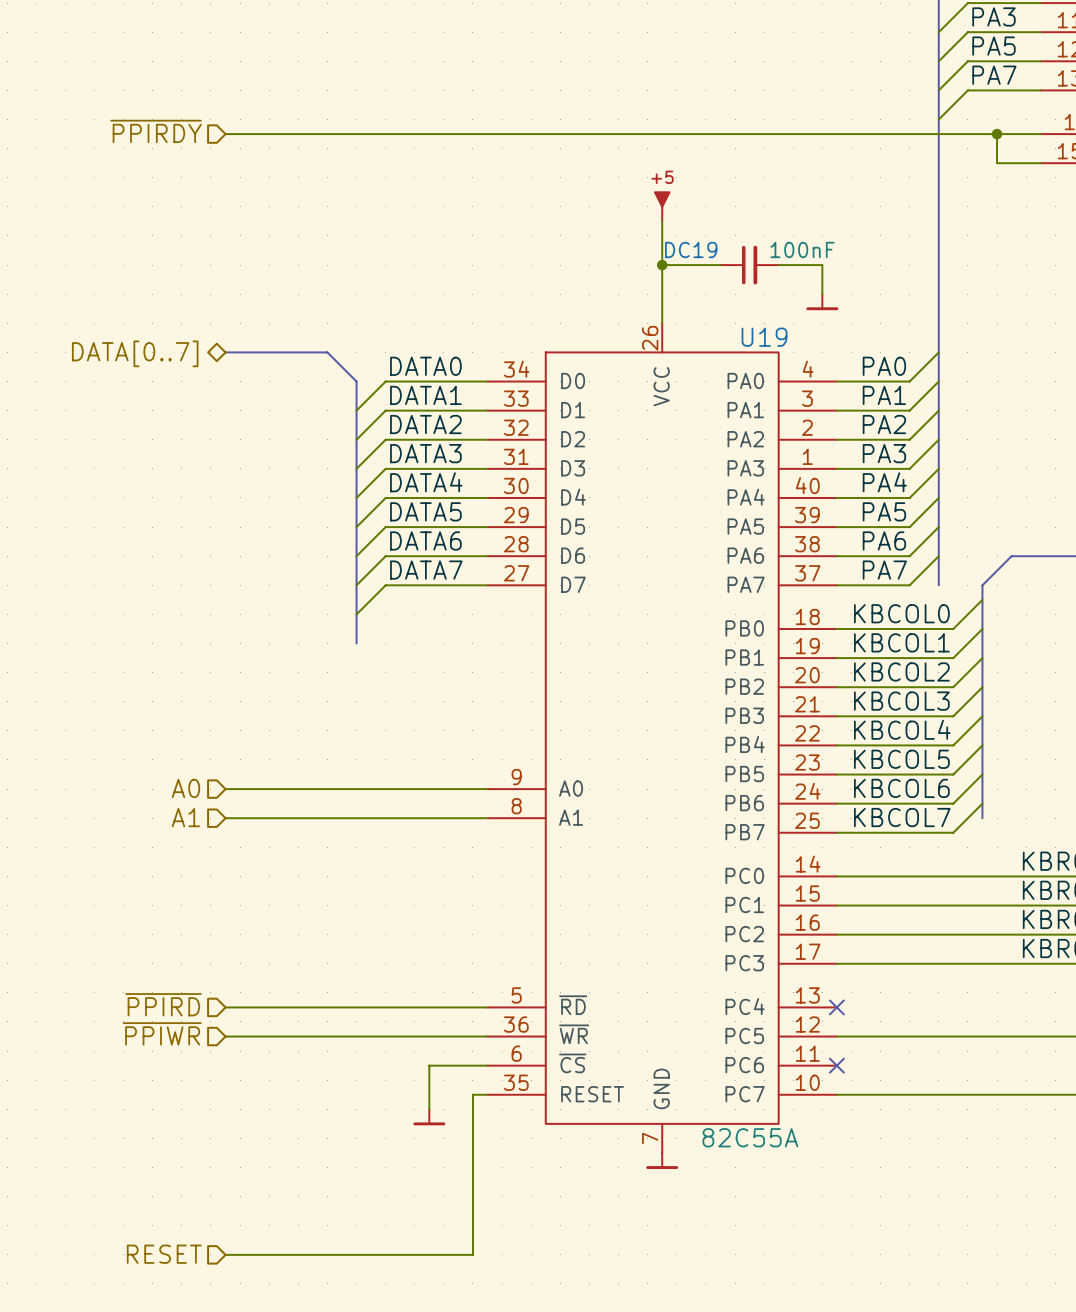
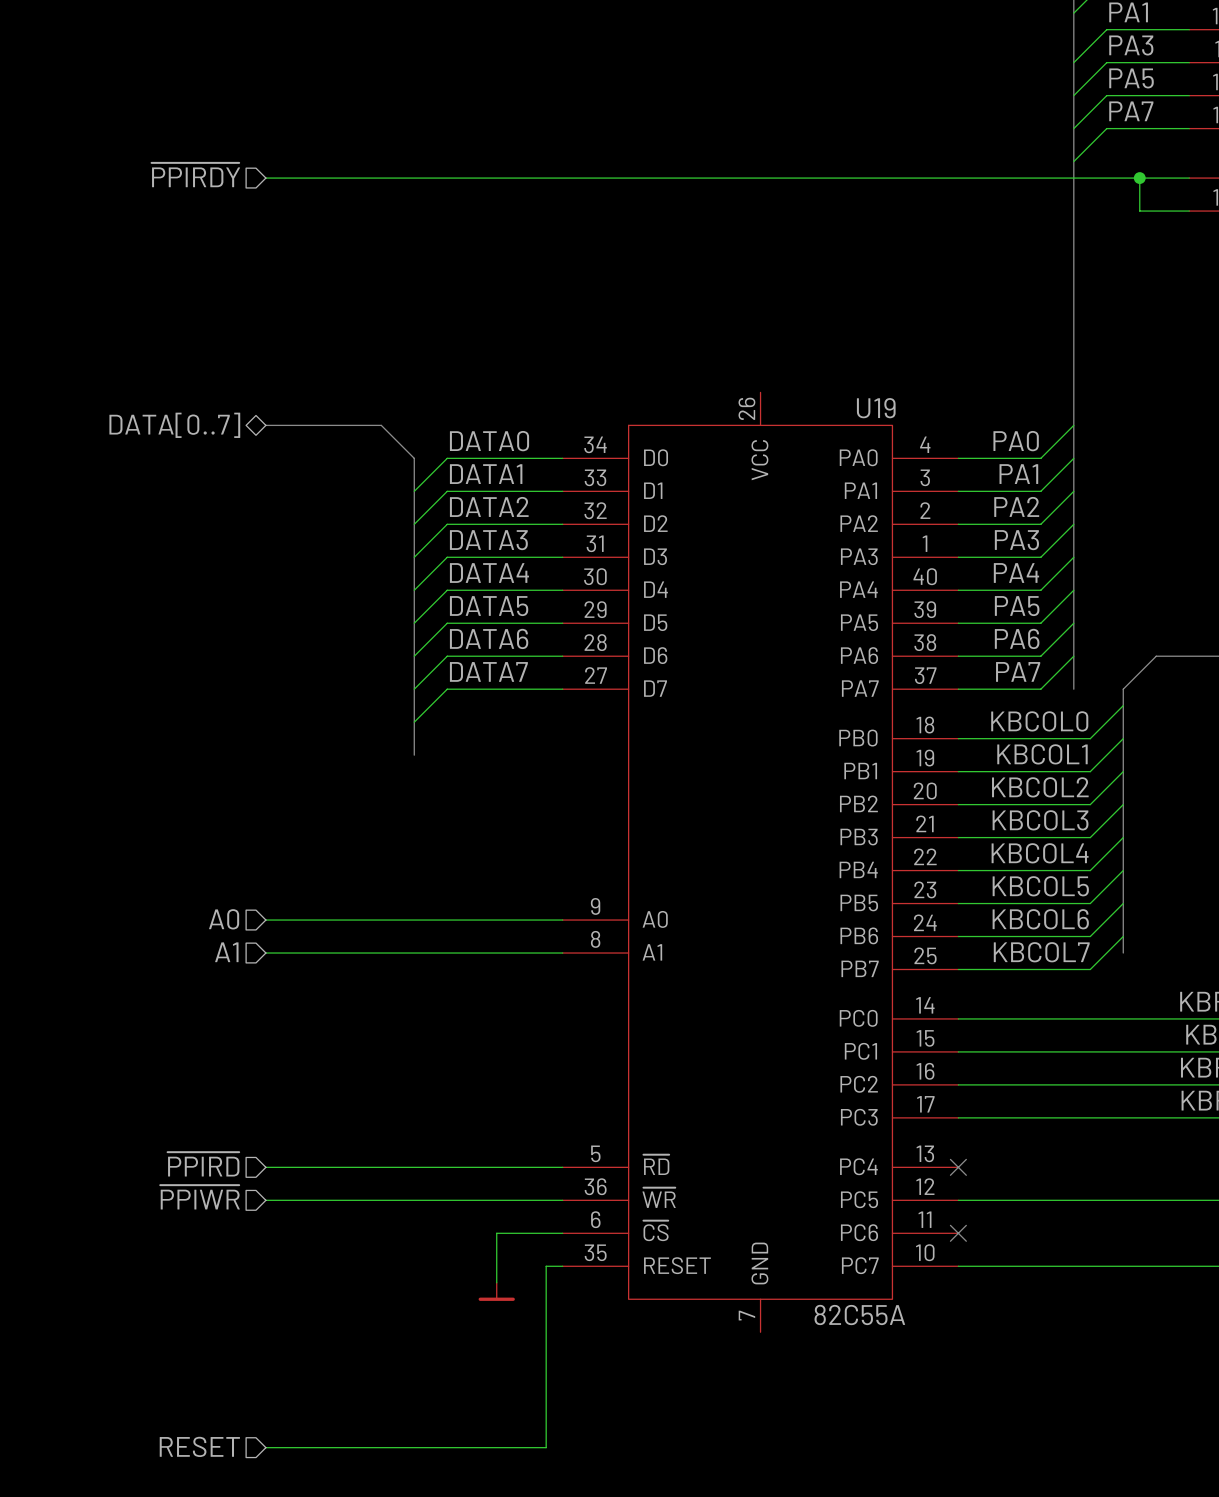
power symbol: (662, 206) -> none
wire: (662, 221) (662, 323) -> none
wire: (662, 265) (720, 265) -> none
junction: (662, 265) -> none
DC19: 100nF (749, 265) -> none
wire: (778, 265) (822, 265) (822, 294) -> none
power symbol: (822, 302) -> none
power symbol: (662, 1160) -> none

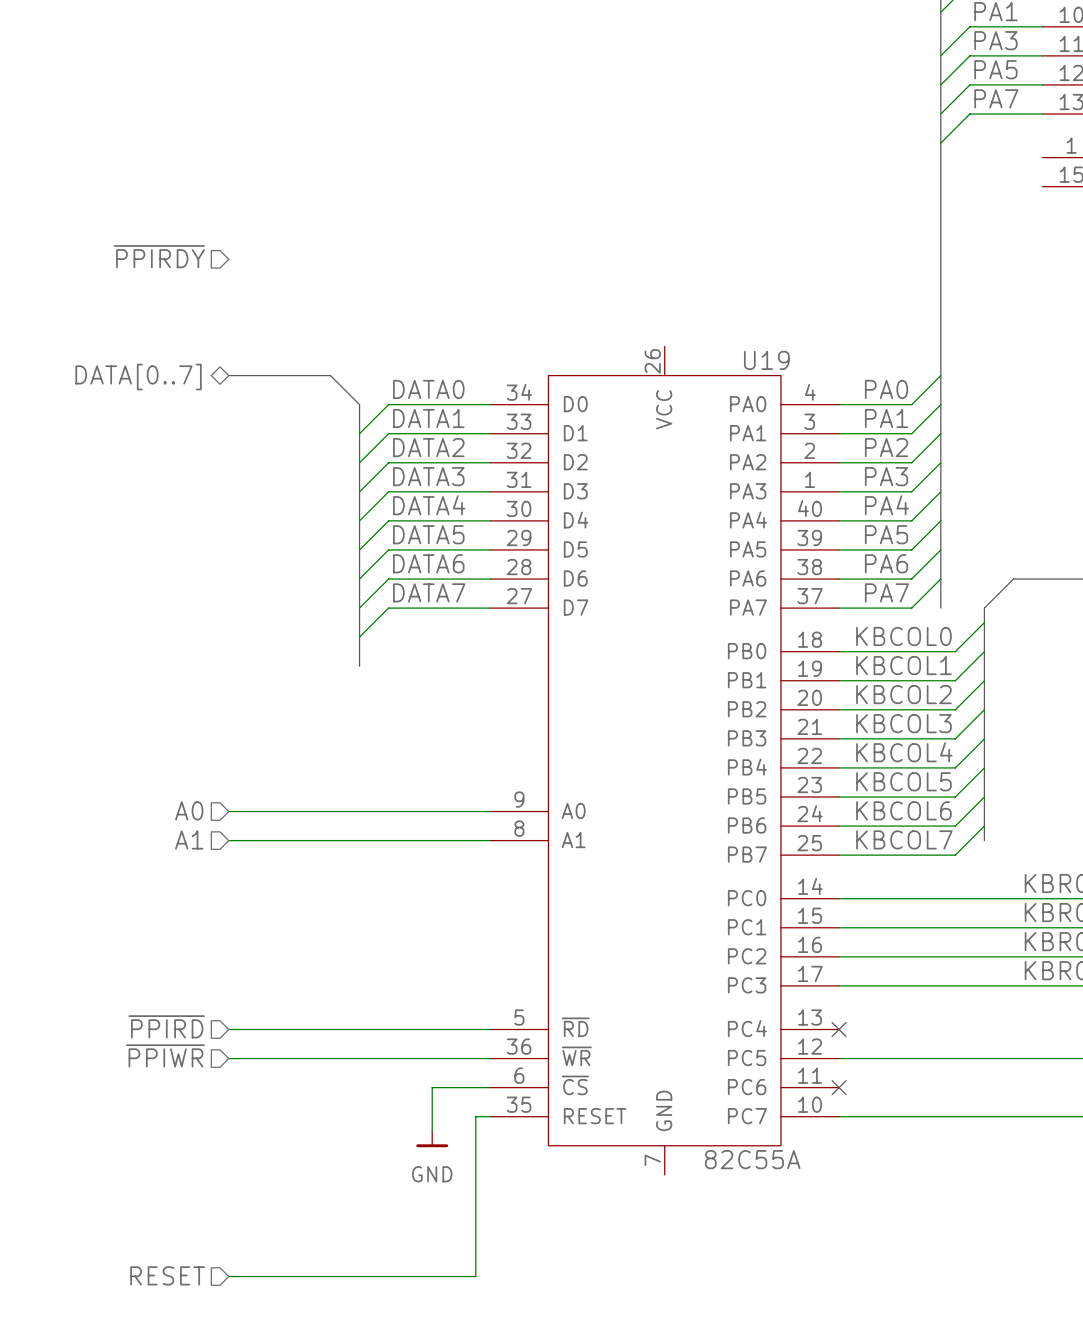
hierarchical label position: ~{PPIRDY} (195, 175) -> ~{PPIRDY} (159, 256)
wire: (265, 178) (1189, 178) -> none
wire: (1139, 178) (1139, 211) (1189, 211) -> none
junction: (1139, 178) -> none
power symbol text: none -> GND (432, 1174)

